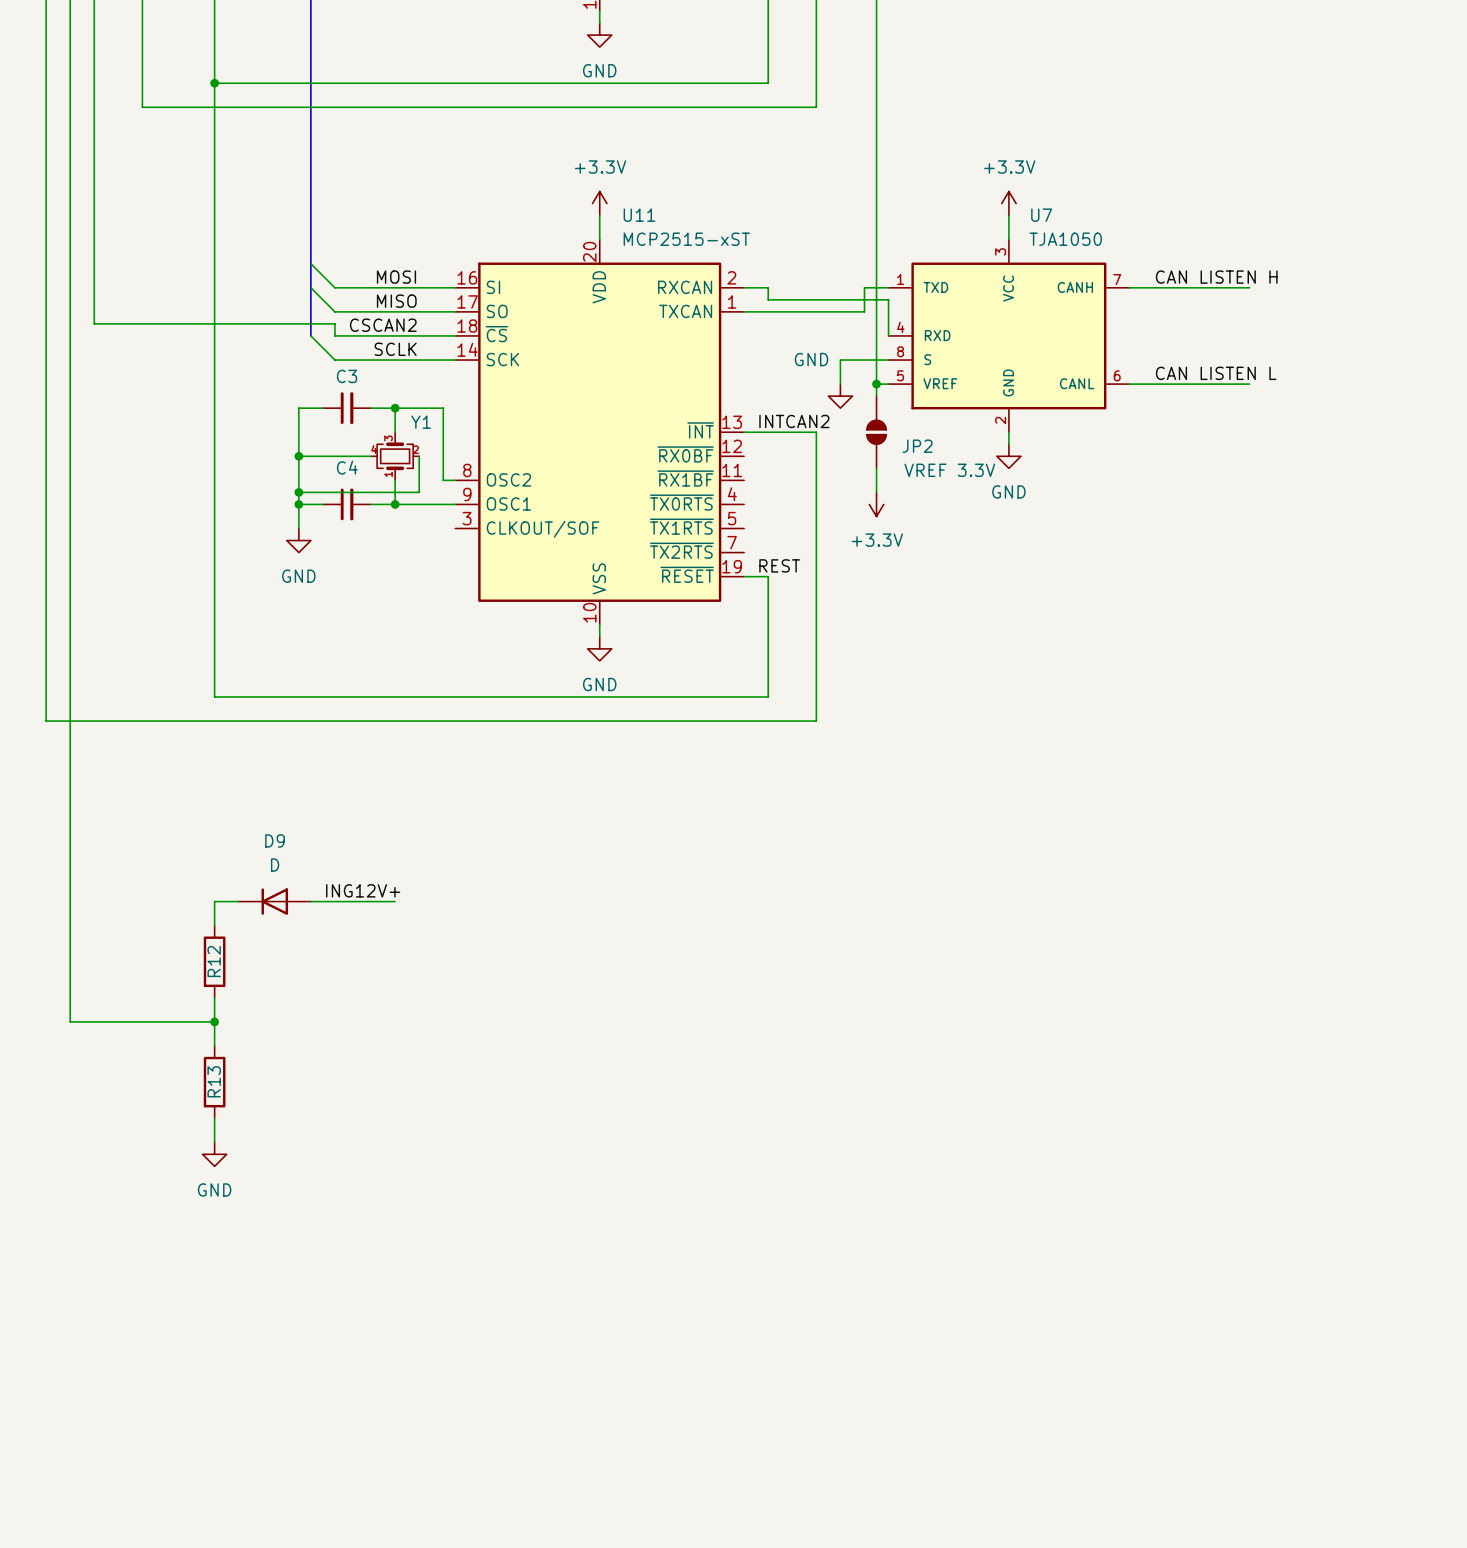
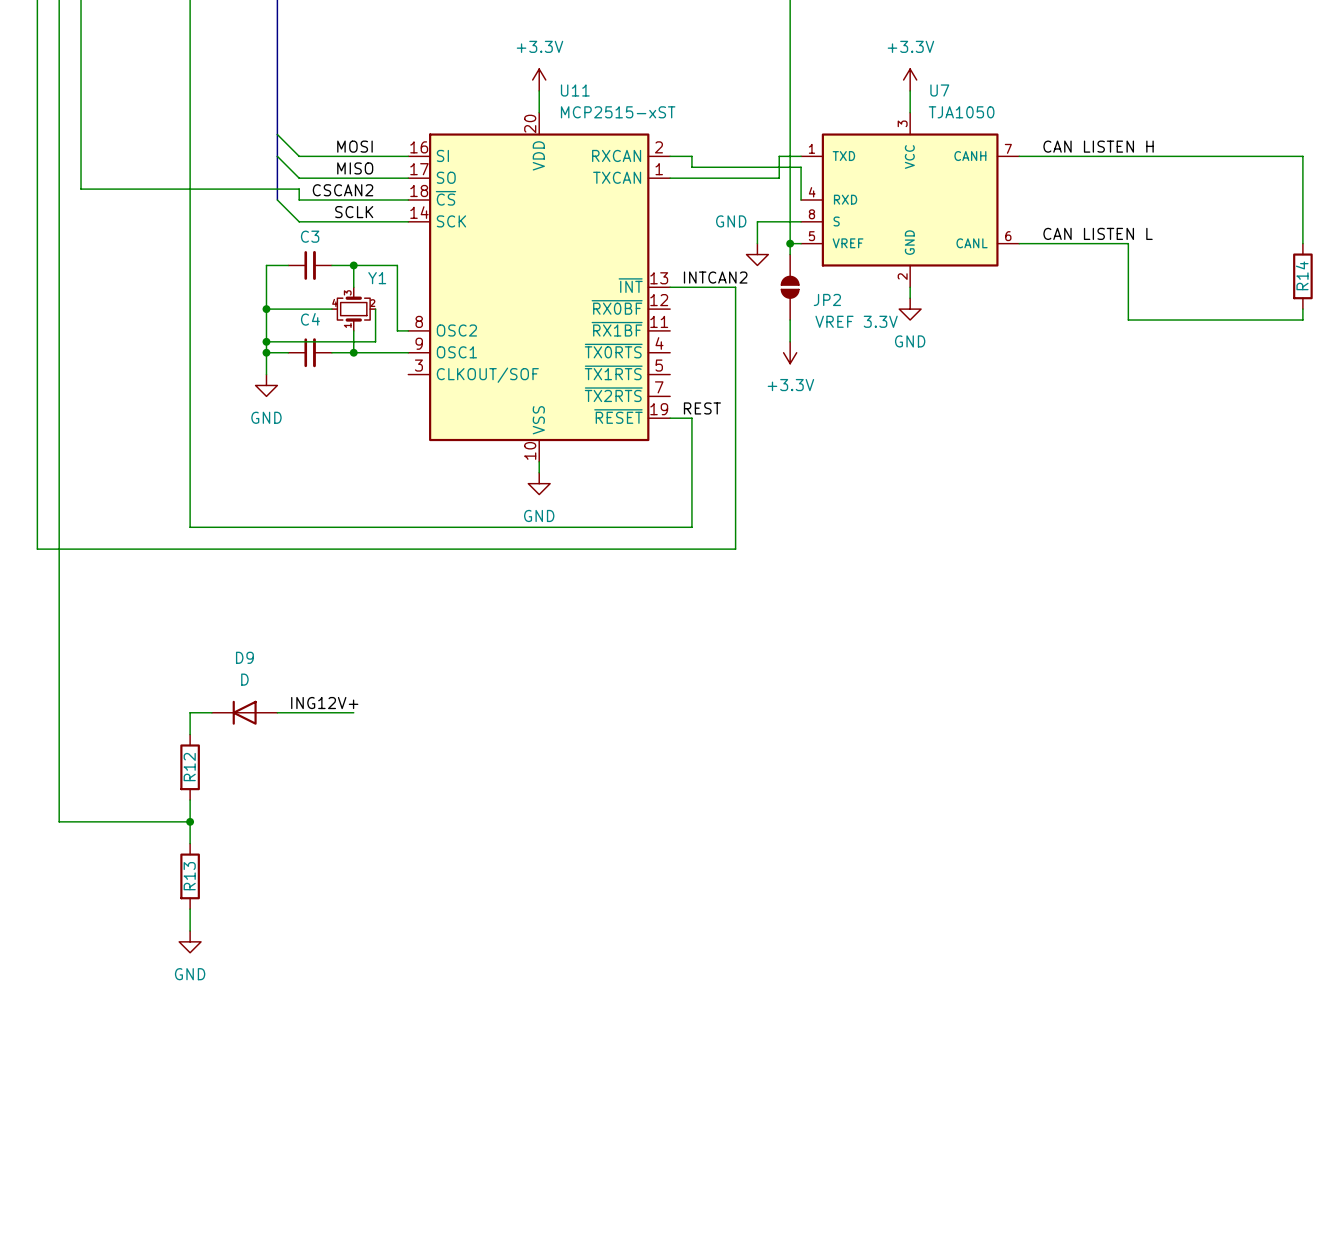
wire: none -> (1128, 156) (1302, 156) (1302, 243)
wire: none -> (1128, 243) (1128, 320) (1302, 320) (1302, 309)
R14: none -> (1302, 276)

